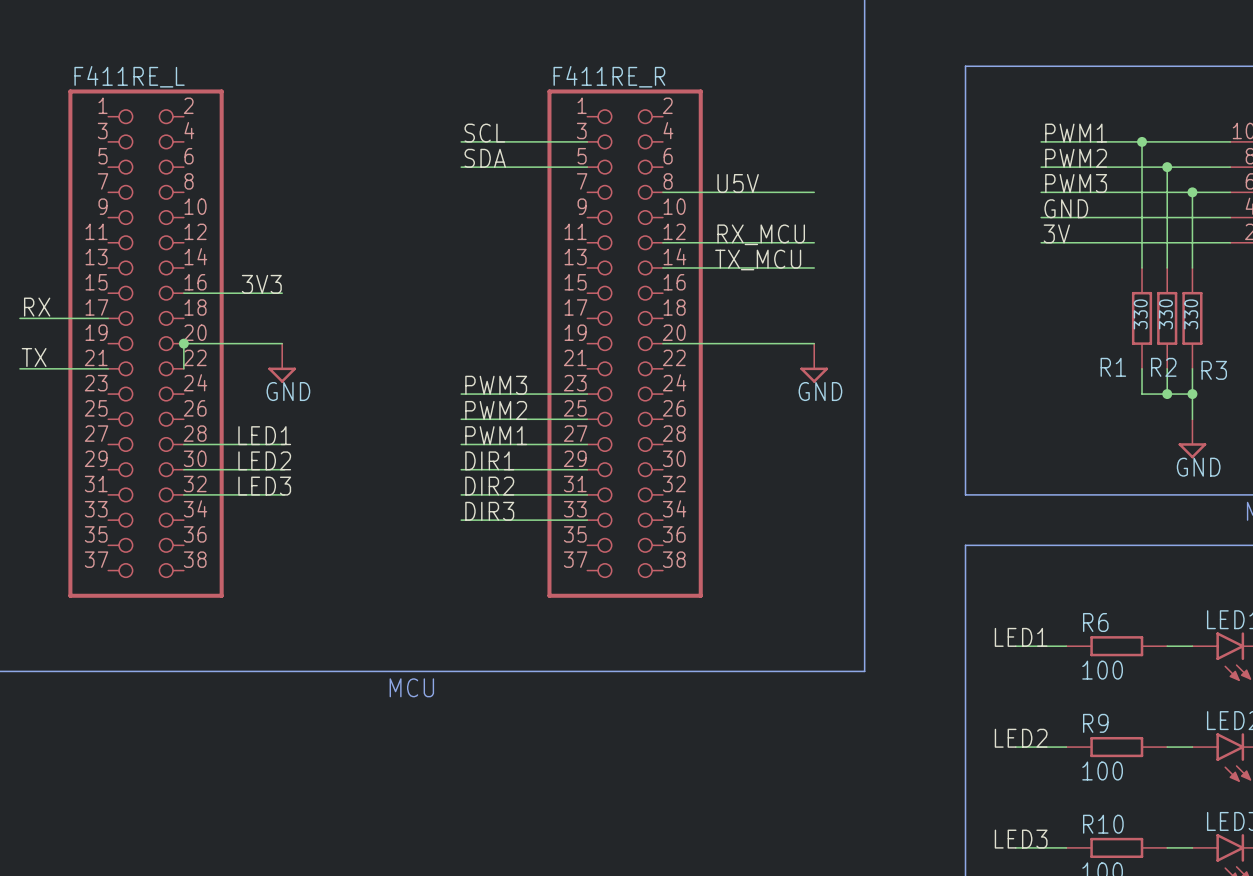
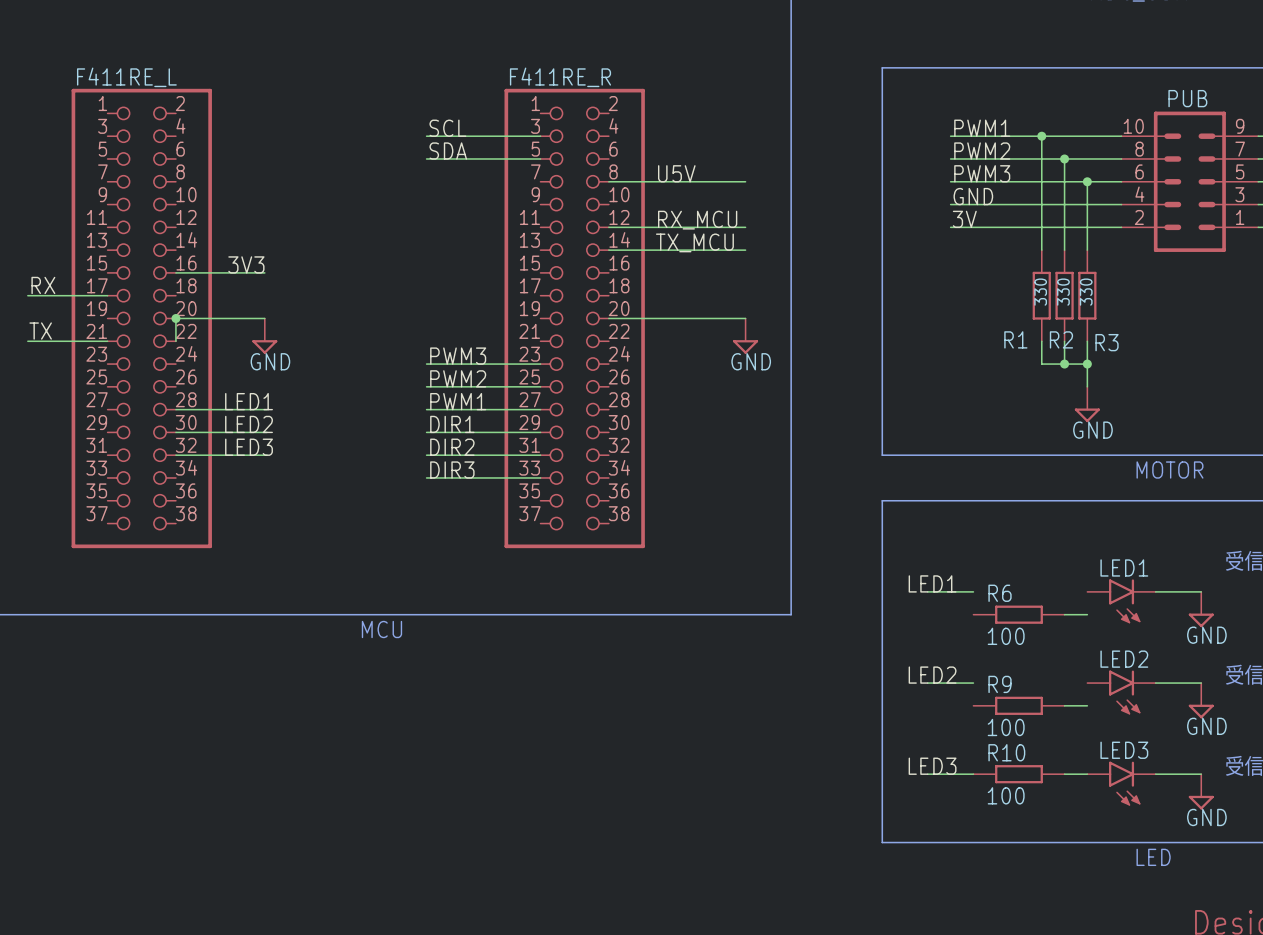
R6 position: (1116, 646) -> (1018, 614)
wire: (1167, 646) (1192, 646) -> (1064, 614) (1087, 614)
R9 position: (1116, 747) -> (1018, 705)
wire: (1167, 747) (1192, 747) -> (1064, 705) (1087, 705)

